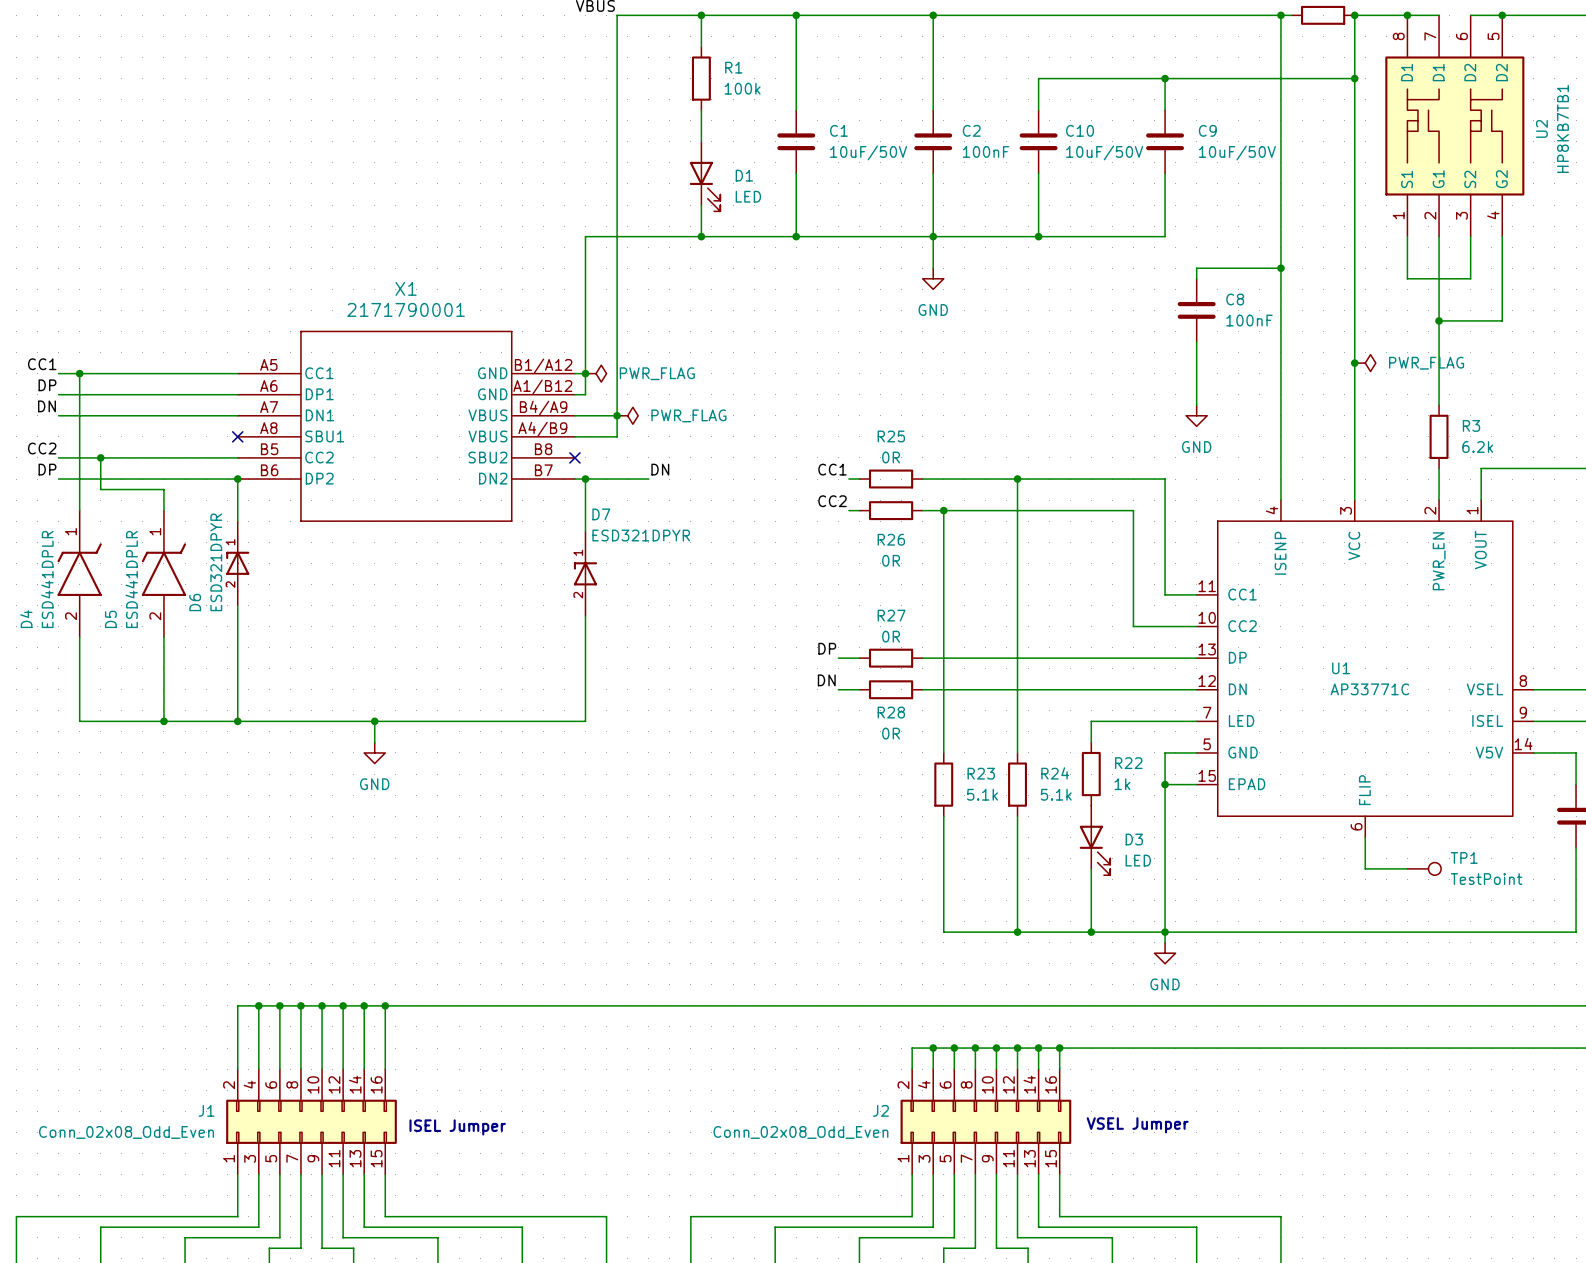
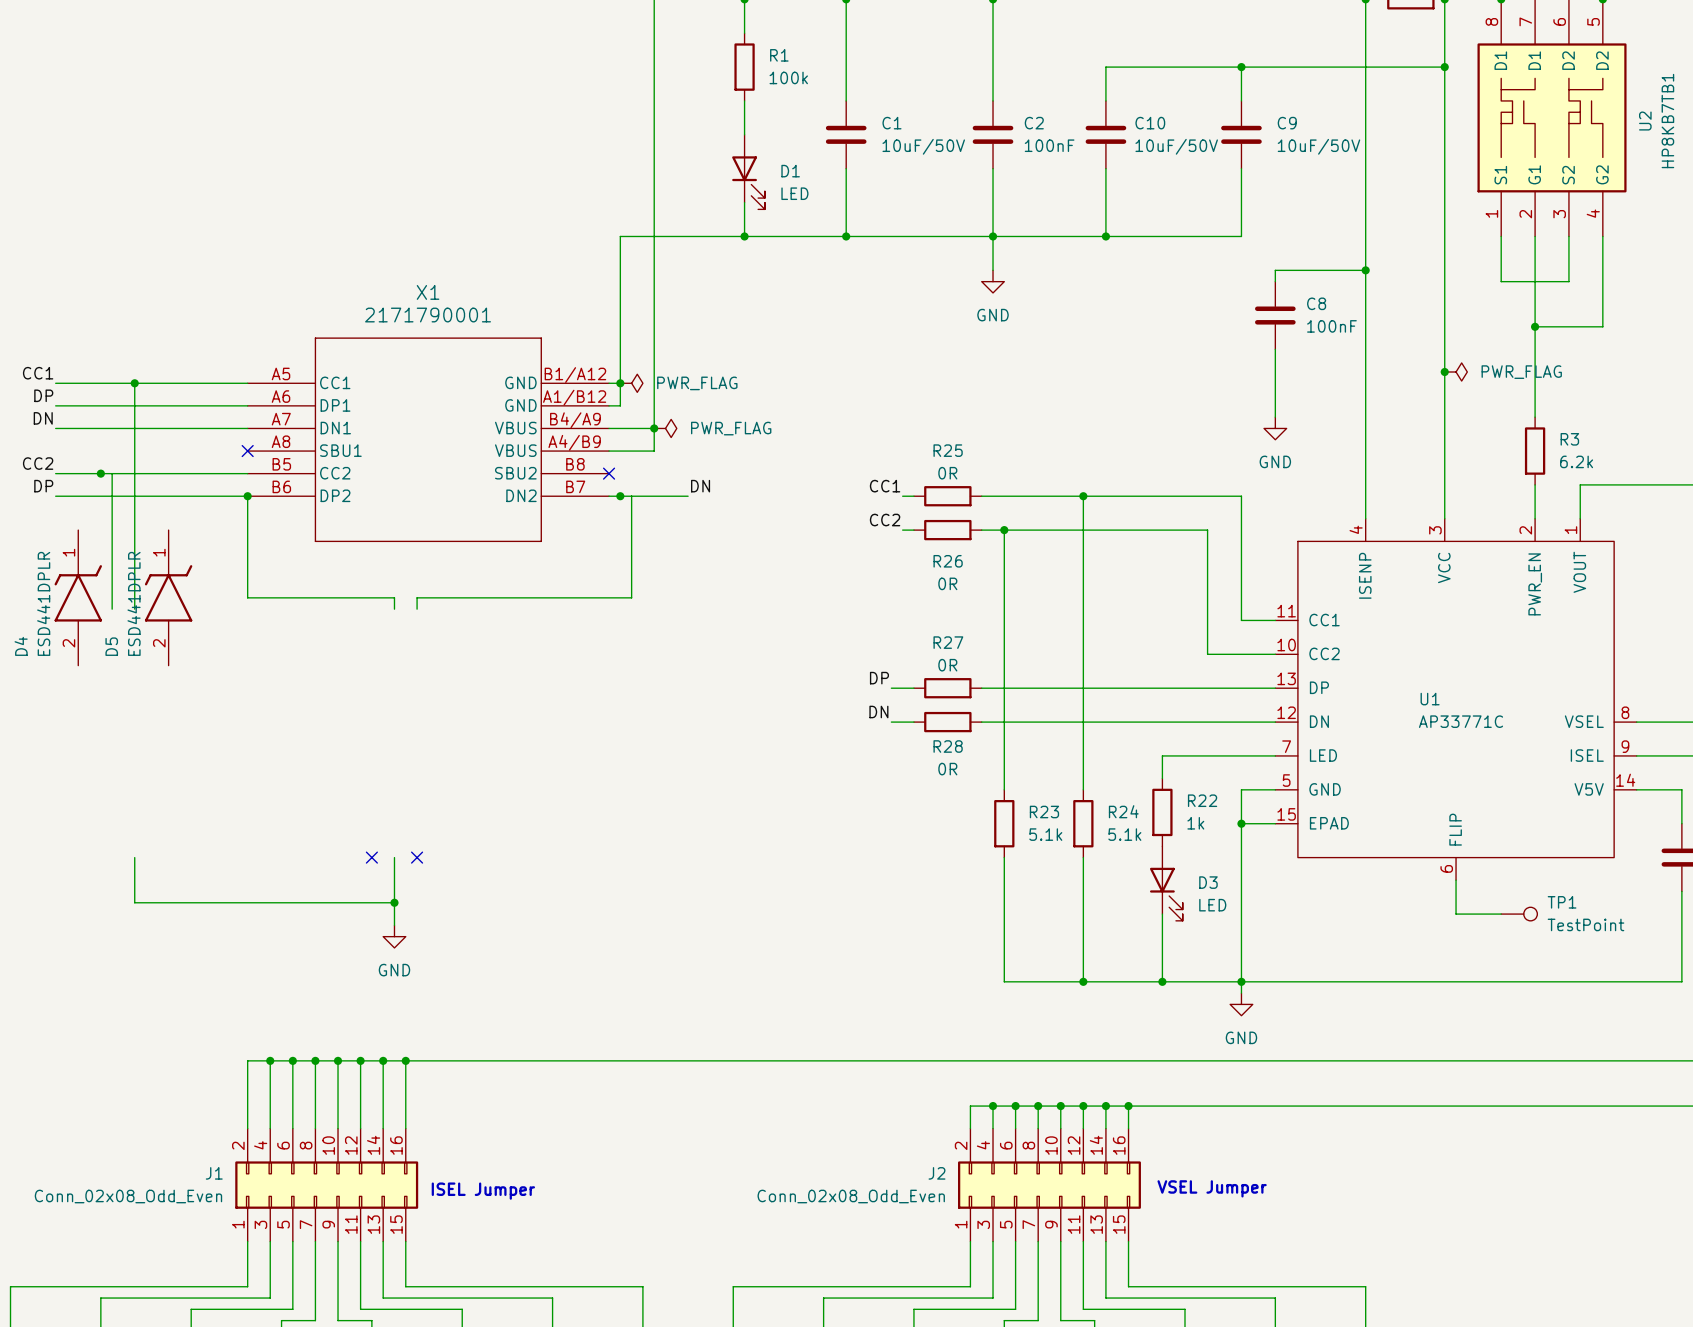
wire: (79, 373) (79, 510) -> none
junction: (79, 373) -> none
wire: none -> (134, 383) (134, 609)
junction: none -> (134, 383)
wire: (100, 457) (100, 489) (163, 489) (163, 510) -> none
wire: none -> (112, 473) (112, 609)
wire: (585, 479) (585, 531) -> none
wire: none -> (631, 496) (631, 597) (417, 597) (417, 609)
wire: none -> (247, 541) (247, 597) (394, 597) (394, 609)
D6: ESD321DPYR (237, 563) -> none
D7: ESD321DPYR (585, 573) -> none
wire: (237, 605) (237, 721) -> none
wire: (585, 615) (585, 721) (79, 721) (79, 637) -> none
wire: (163, 637) (163, 721) -> none
junction: (163, 721) -> none
junction: (237, 721) -> none
wire: (374, 721) (374, 742) -> none
junction: (374, 721) -> none
power symbol position: GND (374, 752) -> GND (394, 936)
wire: none -> (134, 857) (134, 902) (394, 902)
no-connect mark: none -> (371, 857)
wire: none -> (394, 857) (394, 925)
no-connect mark: none -> (417, 857)
junction: none -> (394, 902)

